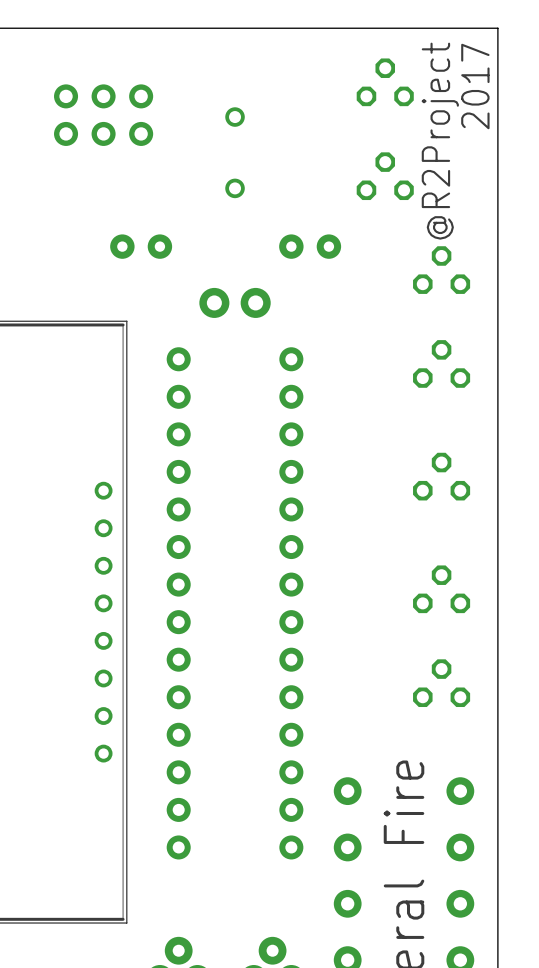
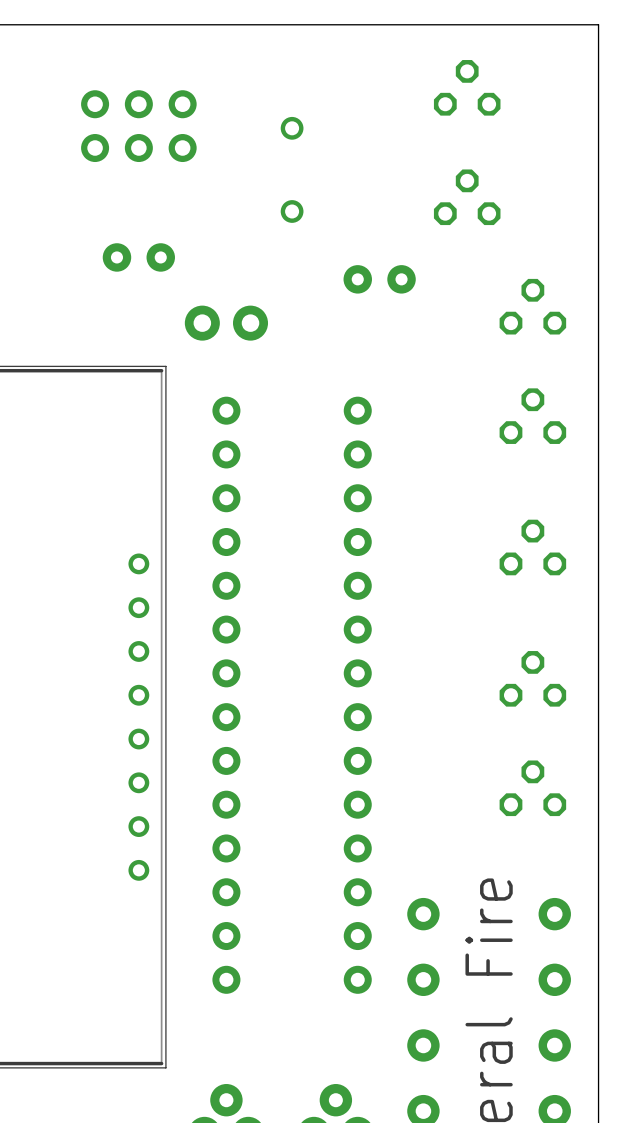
text: 2017 (475, 86) -> none
text: @R2Project (440, 141) -> none
part position: (141, 246) -> (138, 257)
part position: (235, 302) -> (226, 323)

